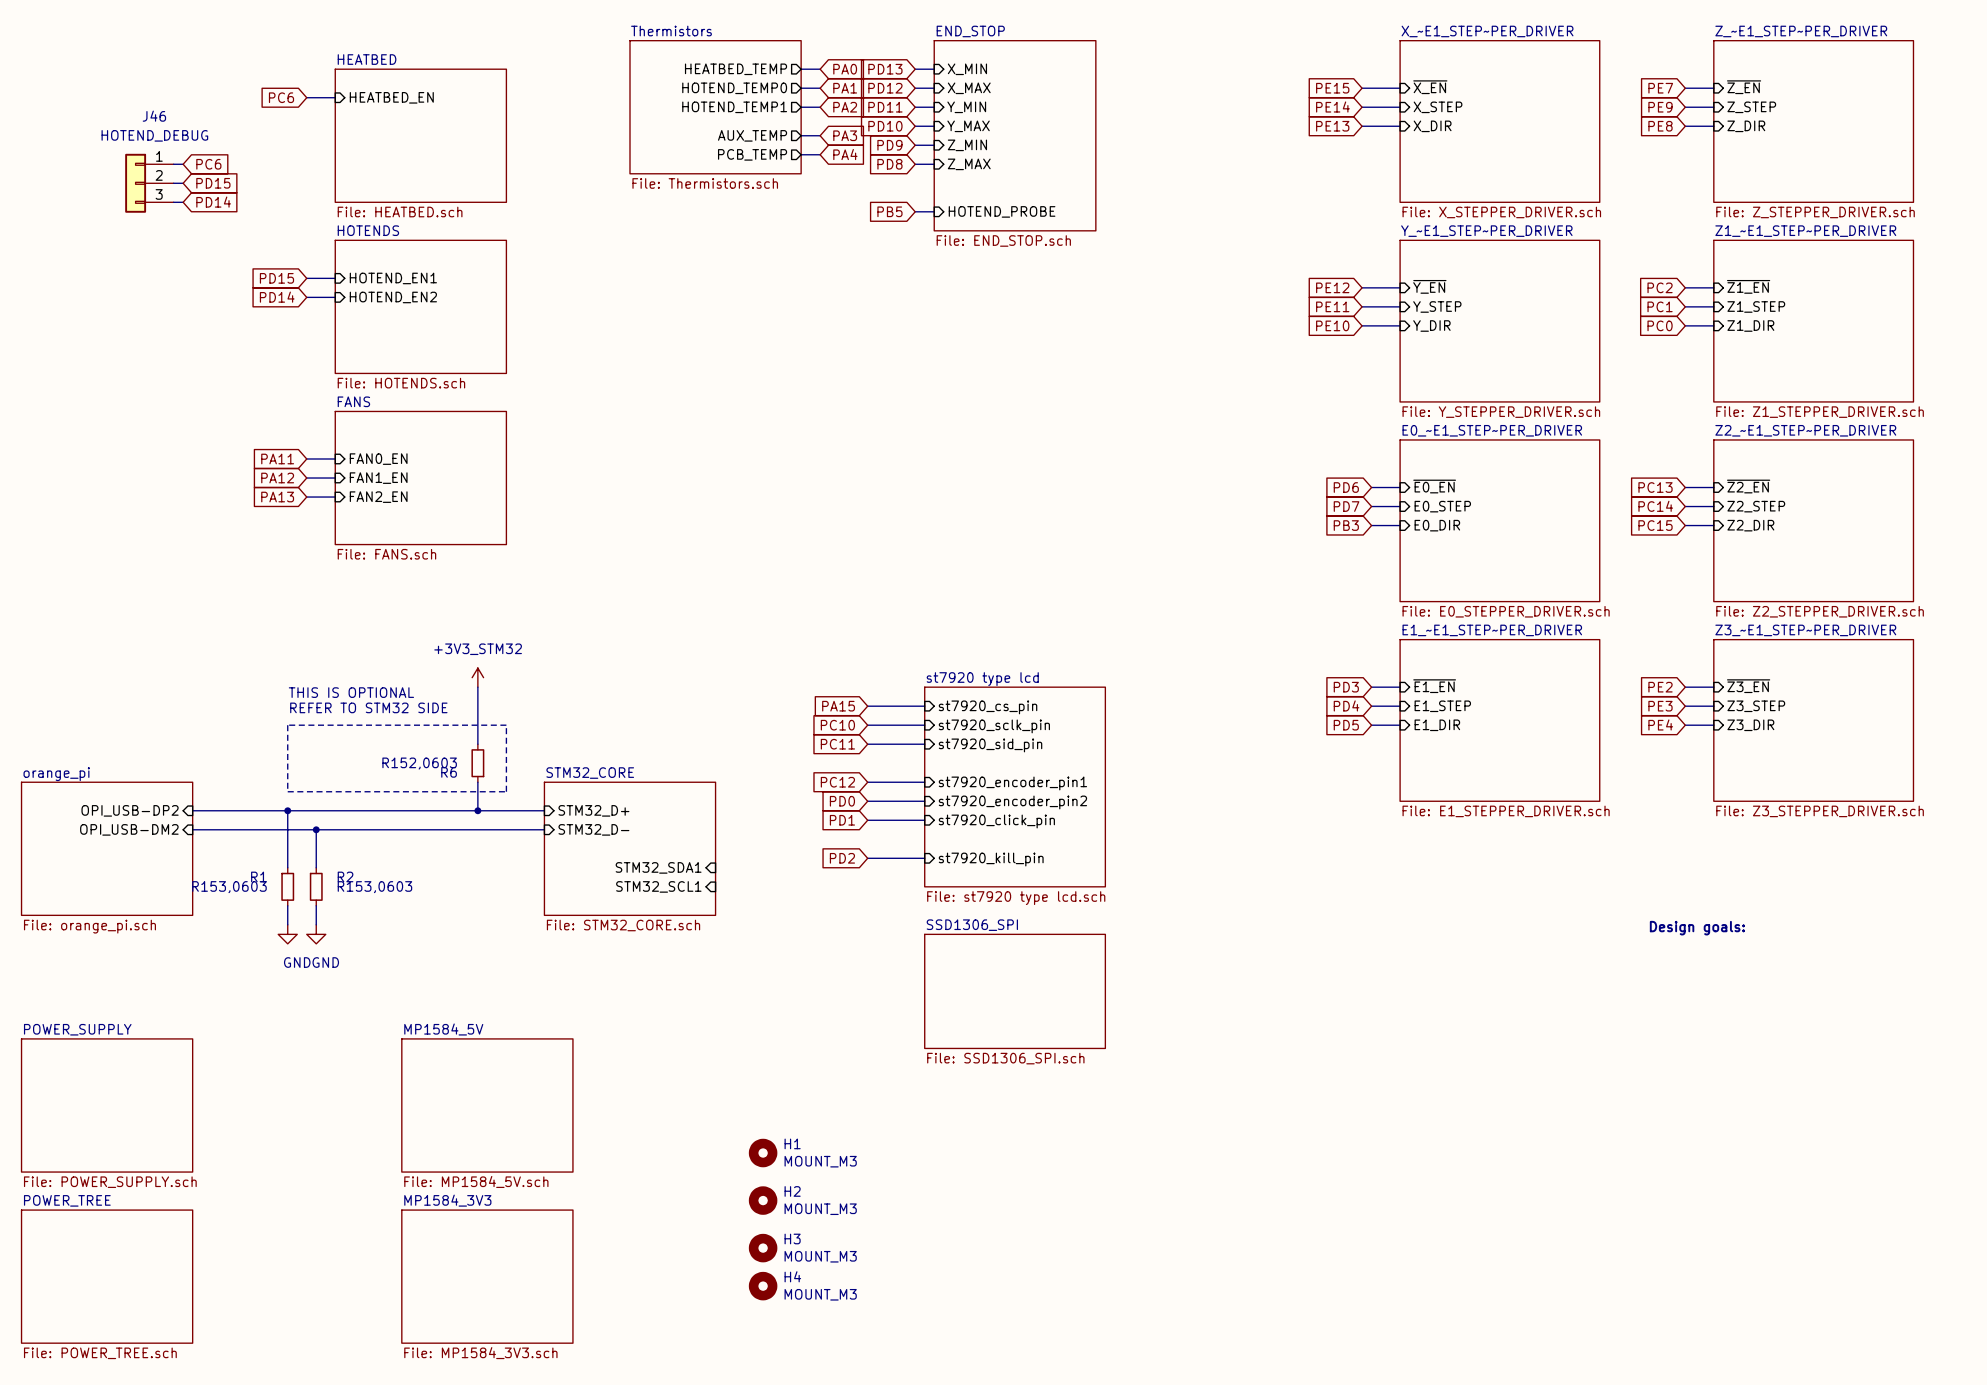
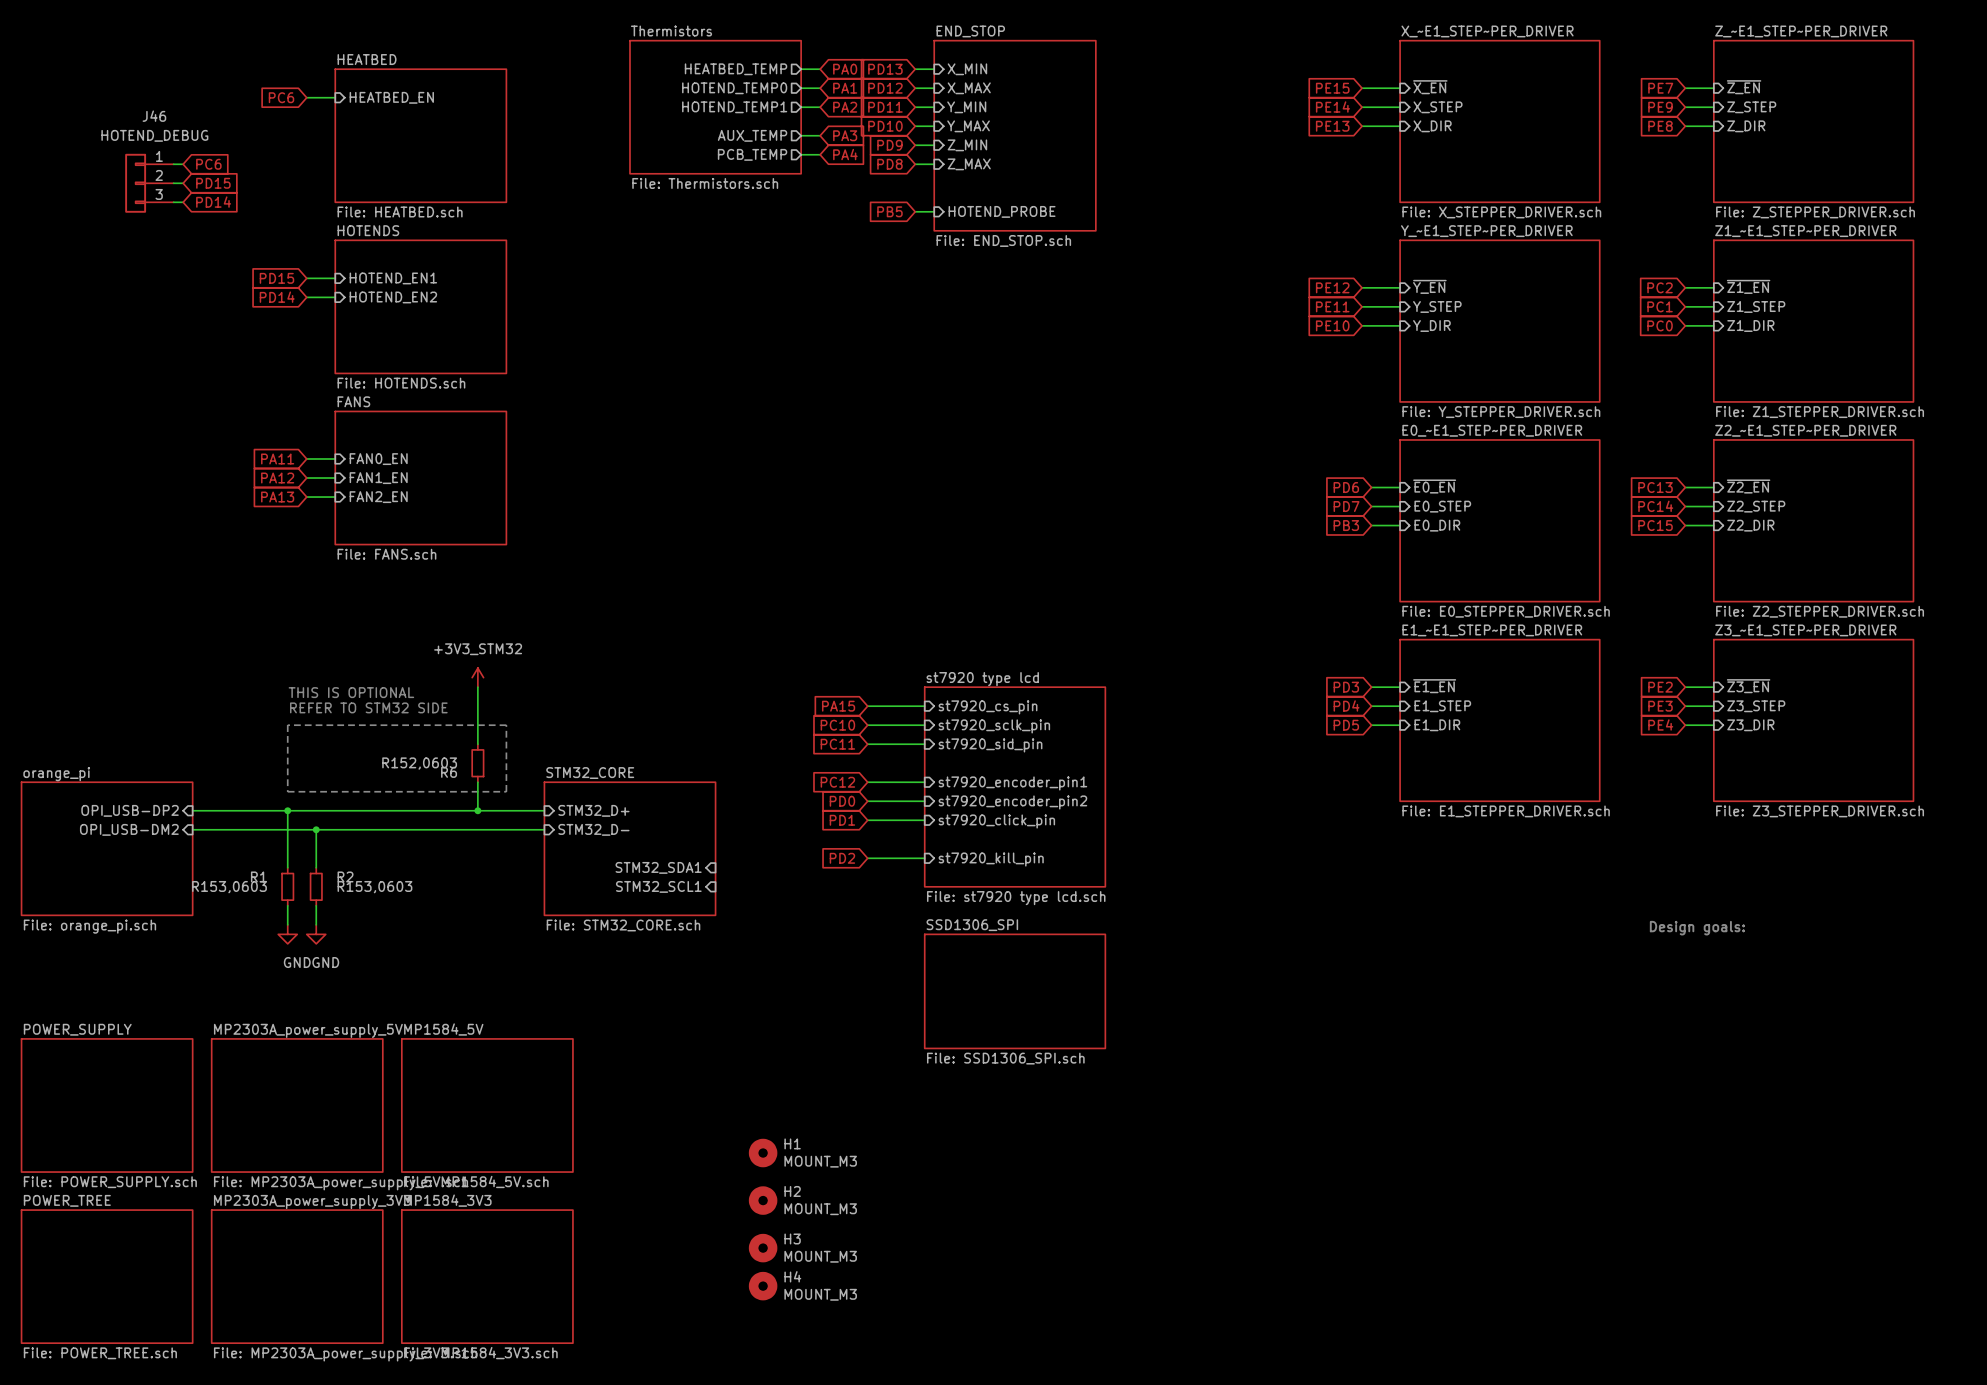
sheet MP2303A_power_supply_5V: none -> File: MP2303A_power_supply_5V.sch (297, 1105)
sheet MP2303A_power_supply_3V3: none -> File: MP2303A_power_supply_3V3.sch (297, 1276)

